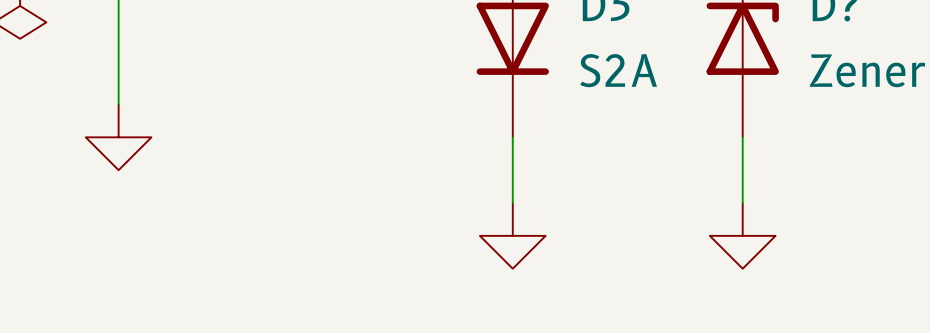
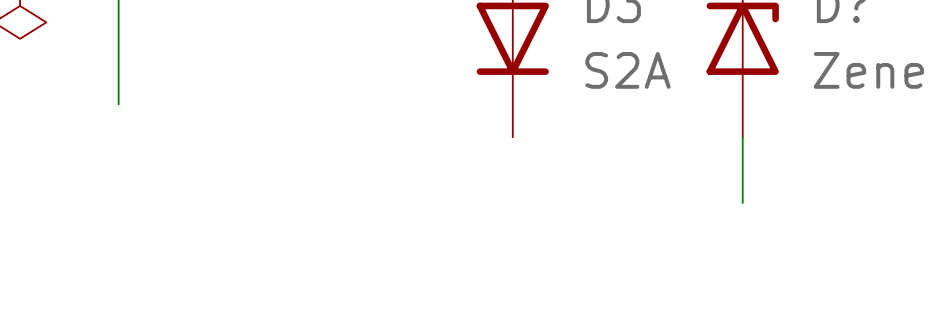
power symbol: (118, 137) -> none
wire: (512, 137) (512, 203) -> none
power symbol: (512, 235) -> none
power symbol: (742, 235) -> none

